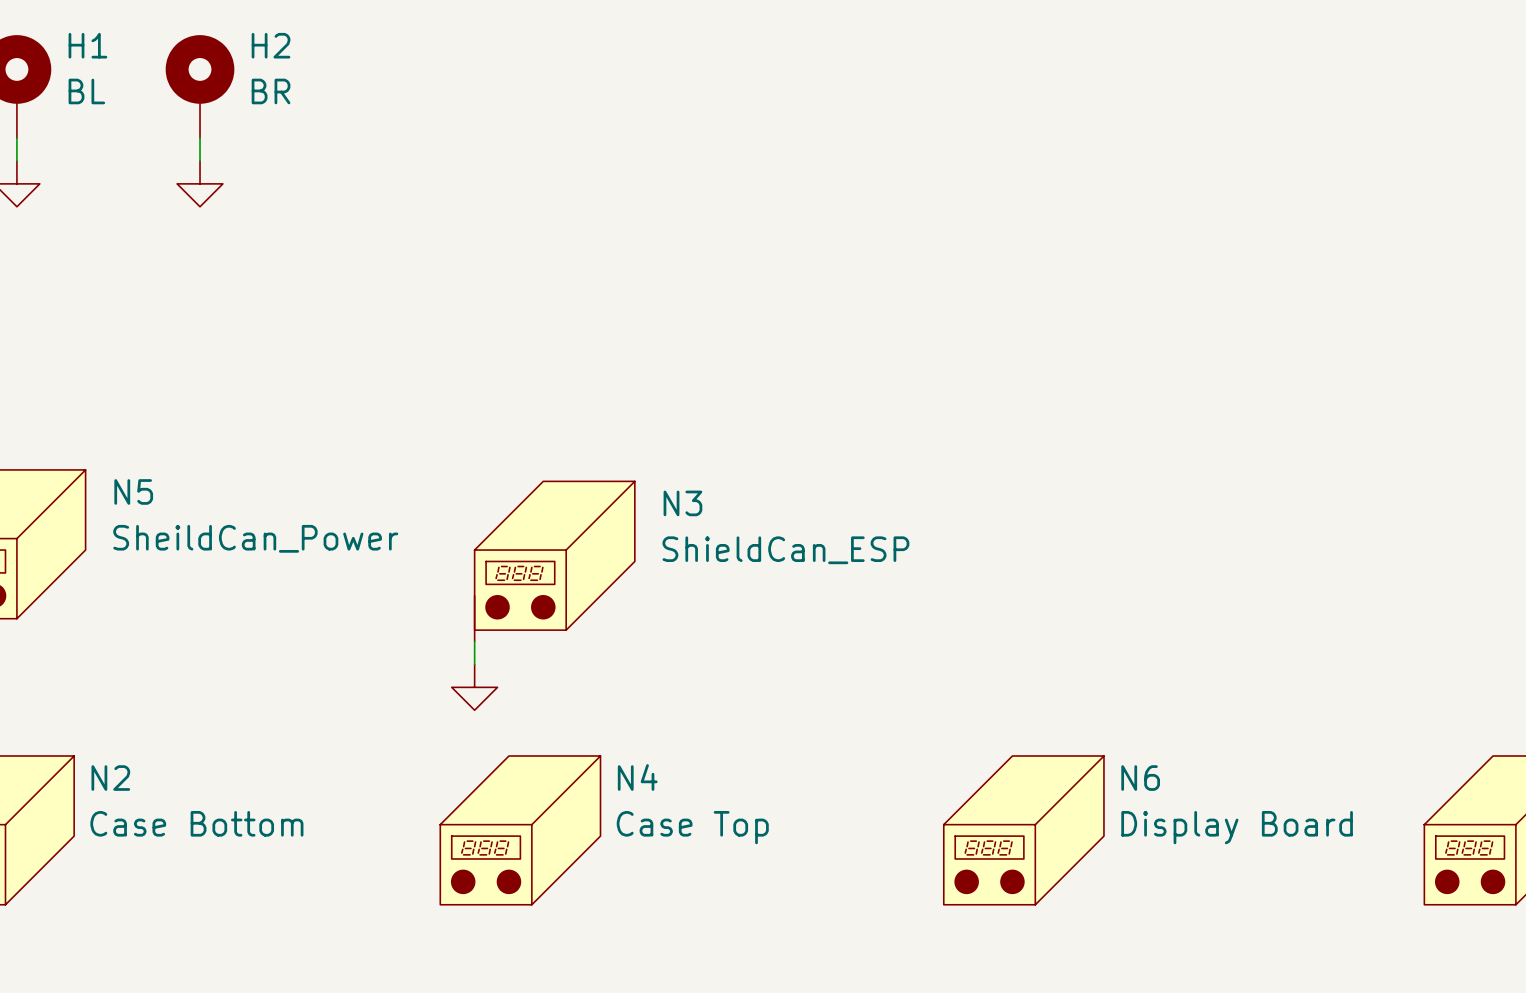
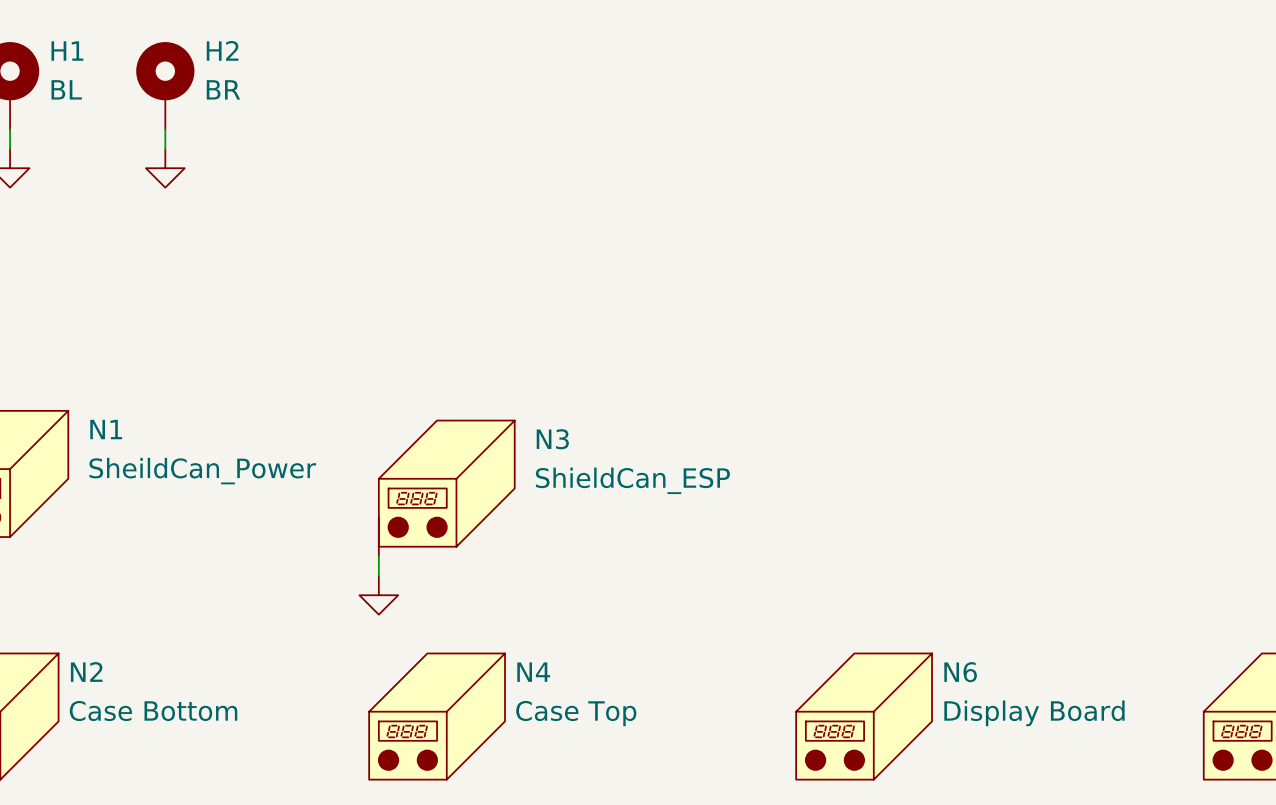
N5 name: N5 (133, 491) -> N1 (106, 429)
N3 position: (554, 561) -> (446, 488)
wire: (474, 641) (474, 664) -> (378, 556) (378, 575)
power symbol position: (474, 687) -> (378, 595)

